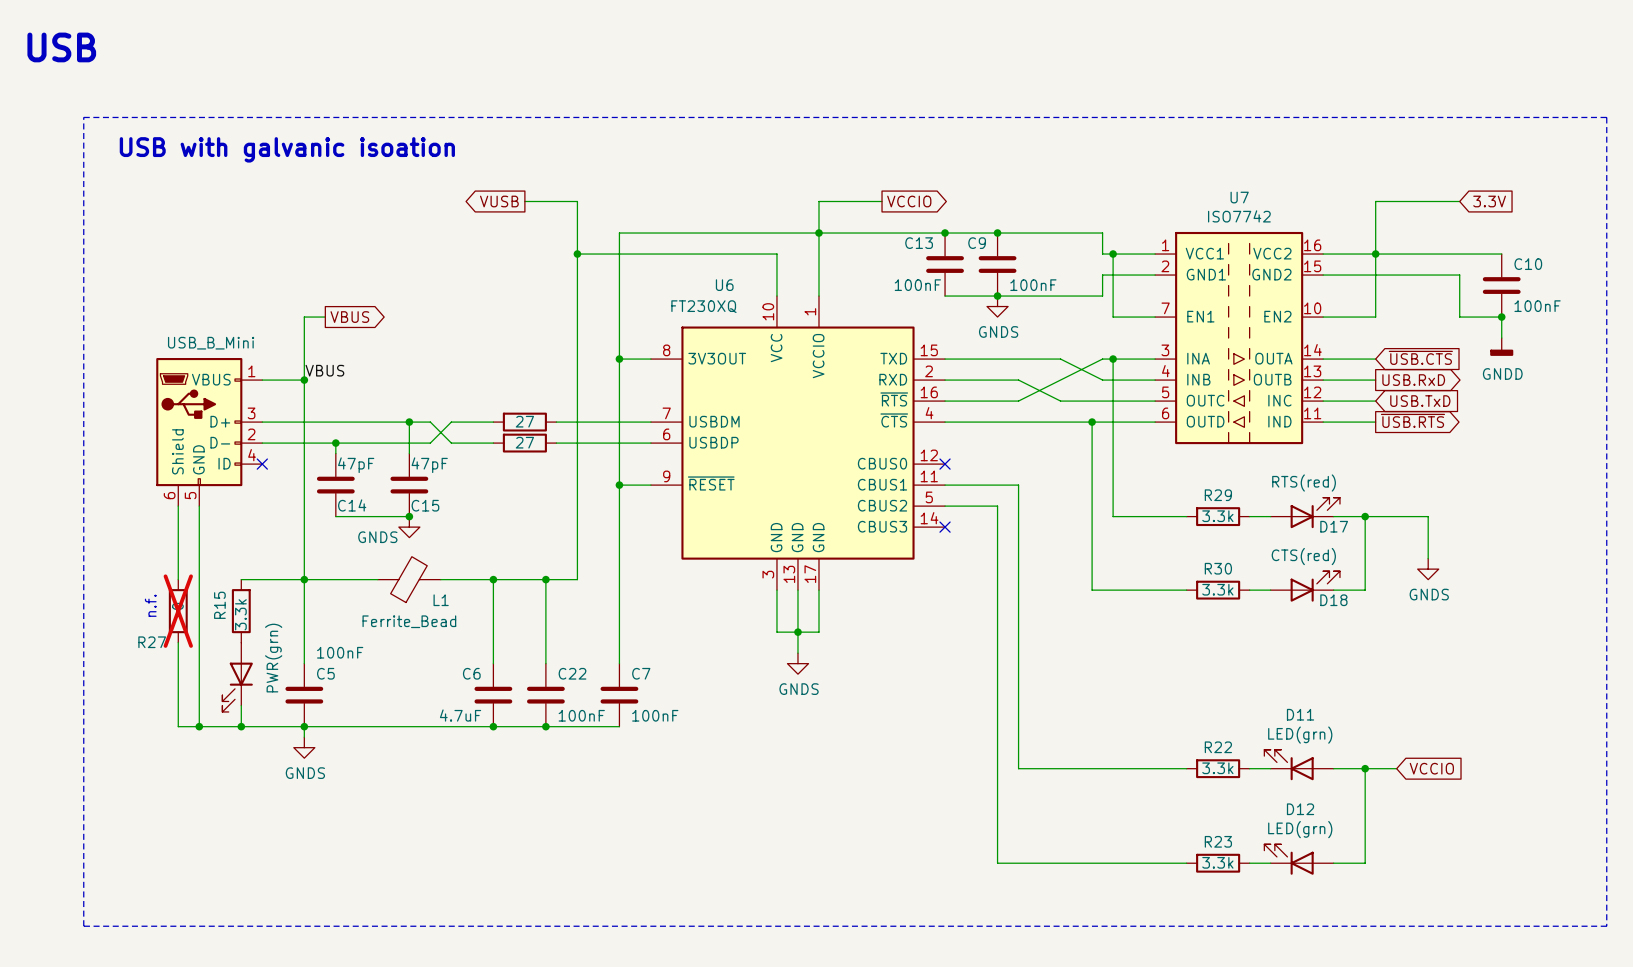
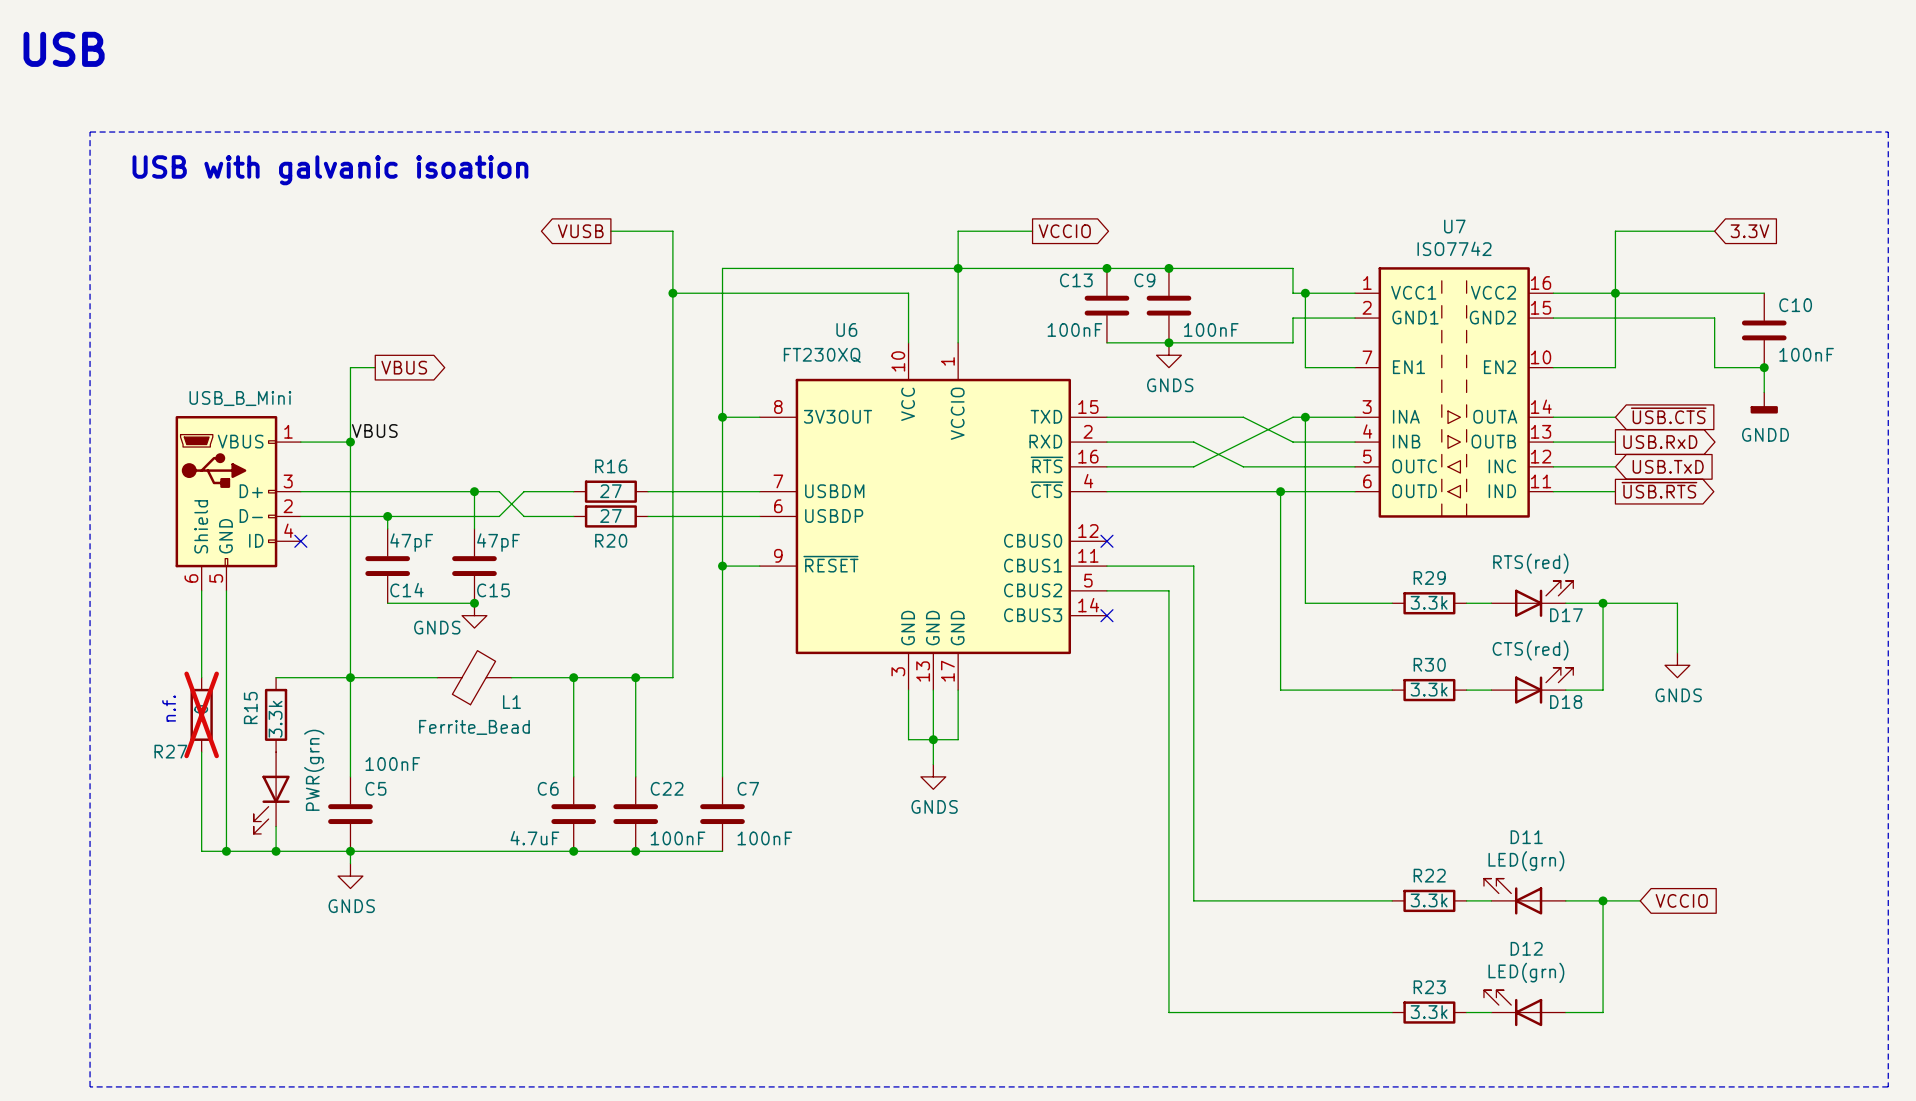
R16 name: none -> R16 (611, 466)
R20 name: none -> R20 (611, 540)

